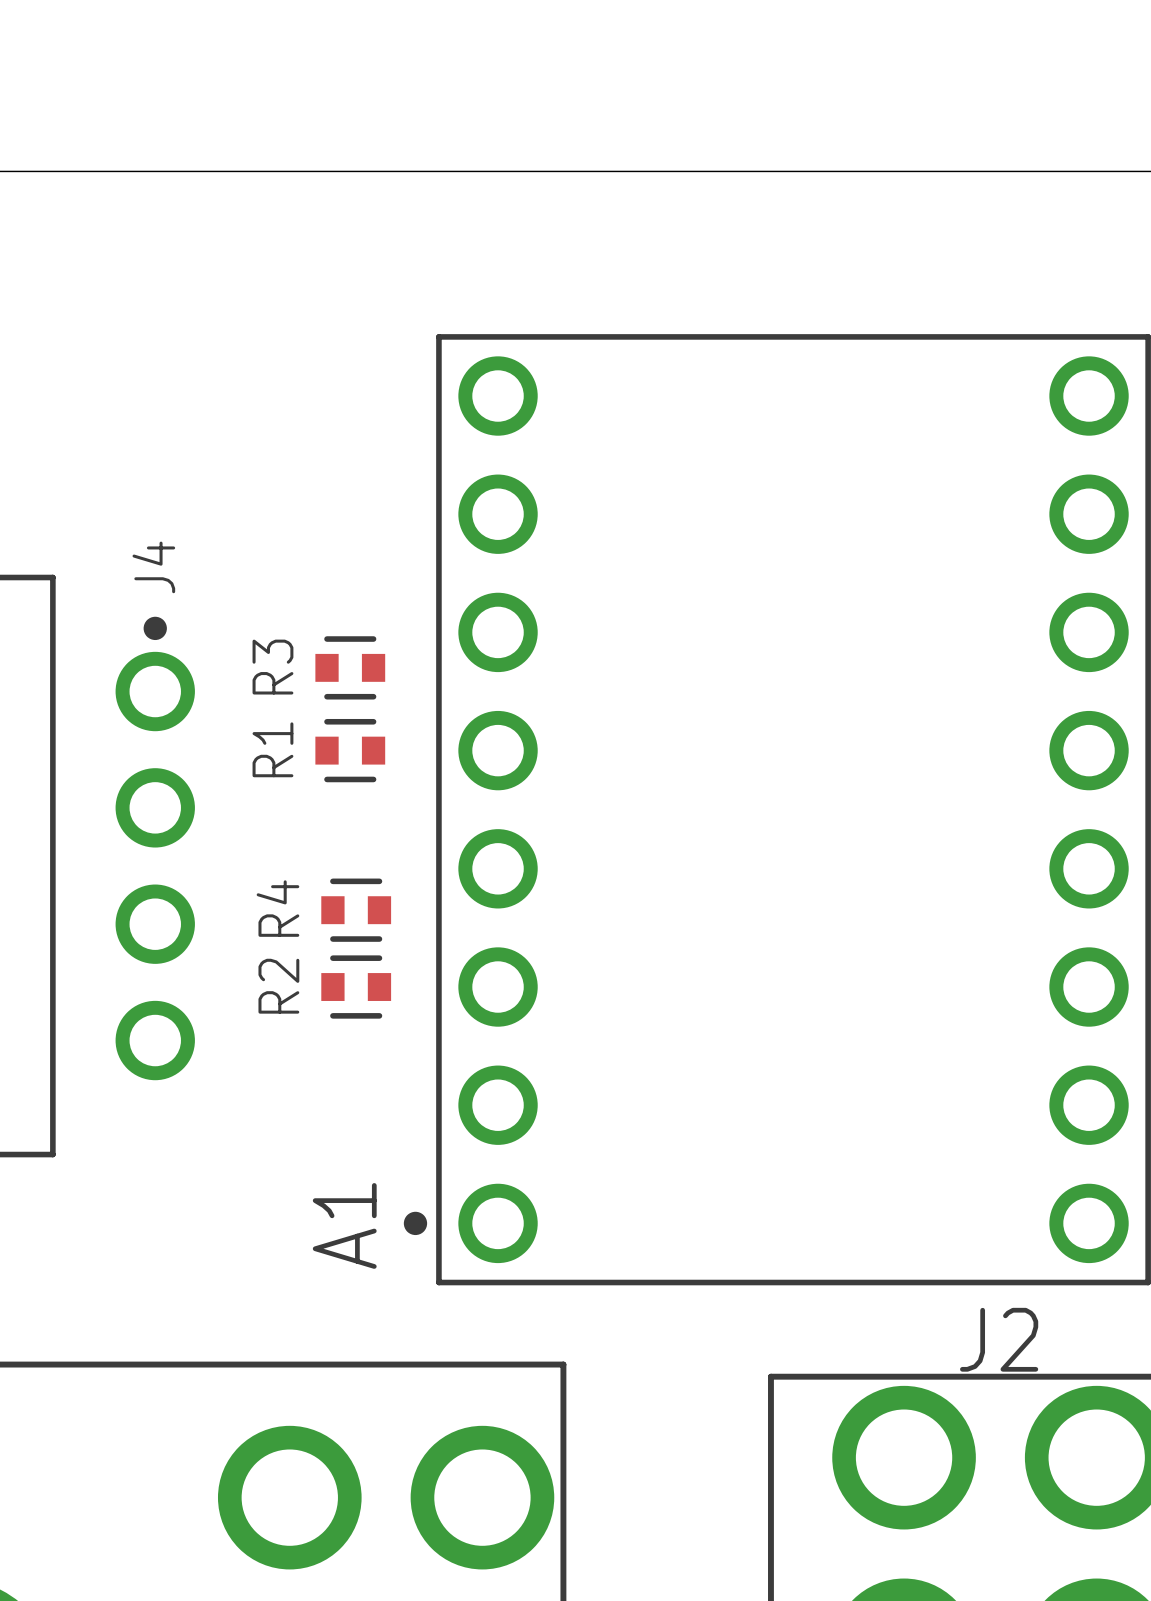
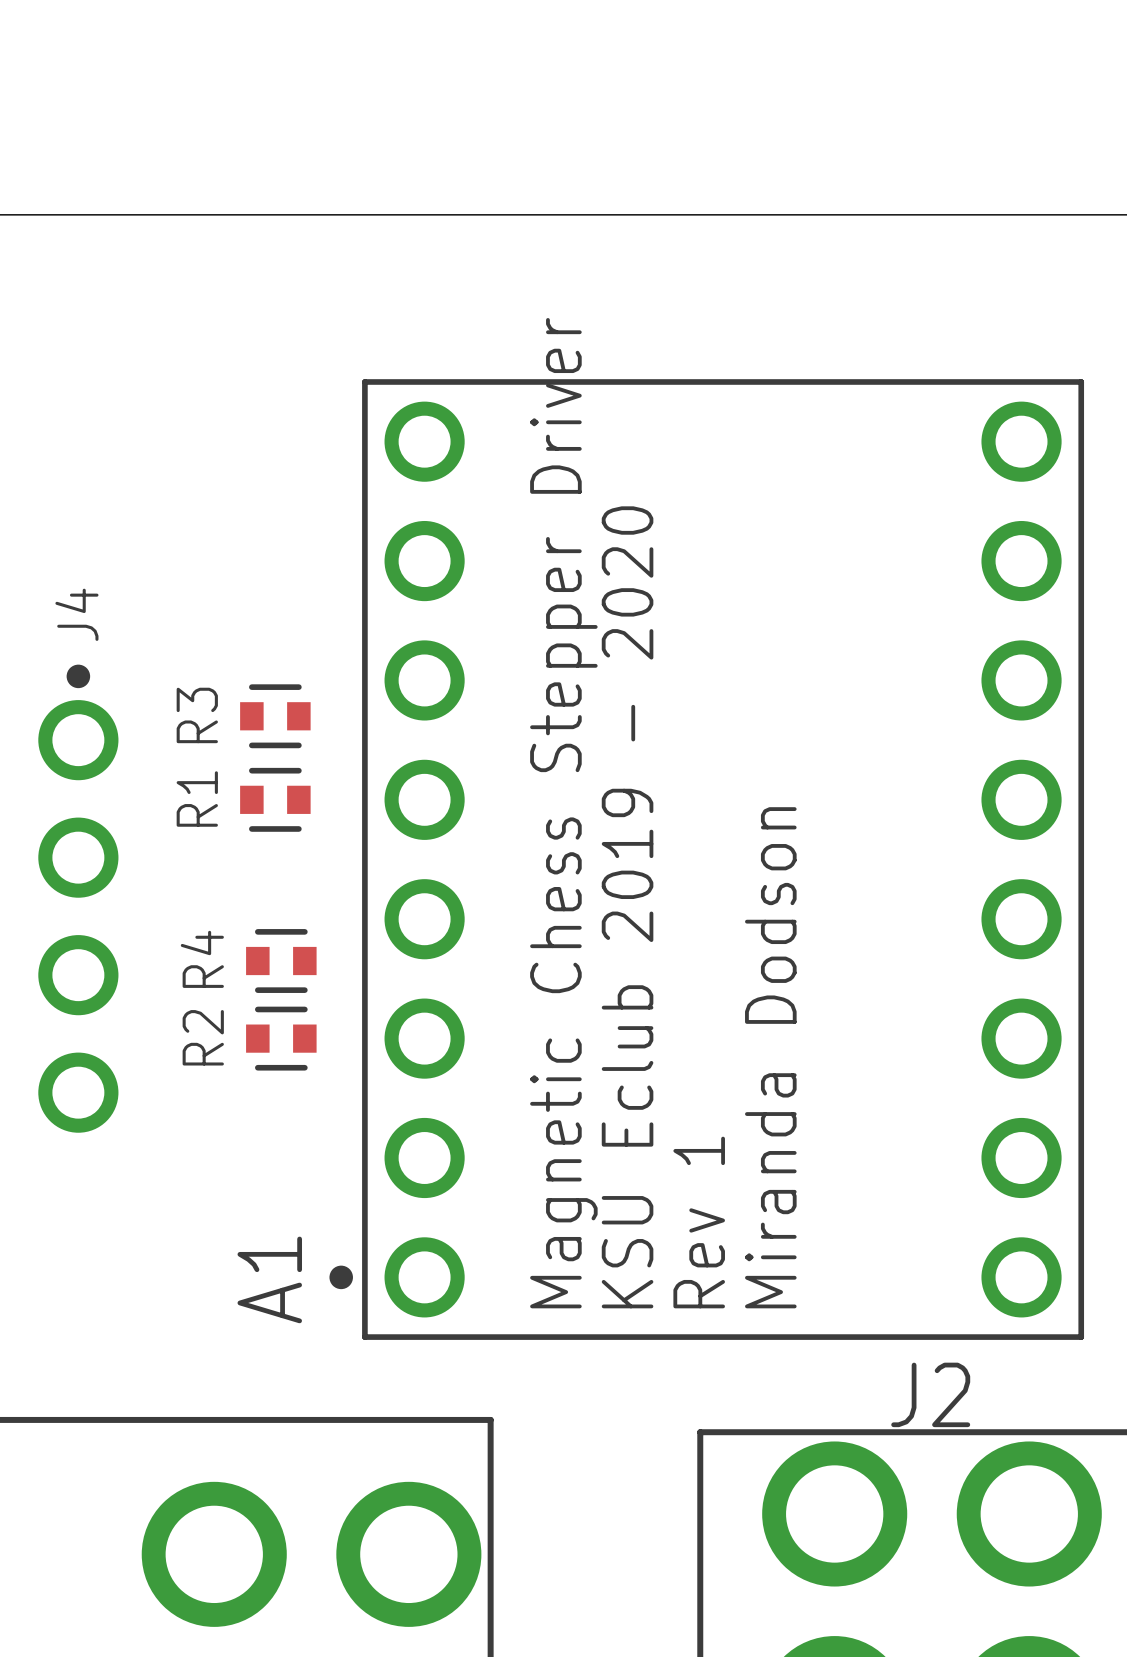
text: none -> Magnetic Chess Stepper Driver (563, 813)
text: none -> KSU Eclub 2019 - 2020 (627, 907)
text: none -> Miranda Dodson (770, 1057)
text: none -> Rev 1 (699, 1222)

